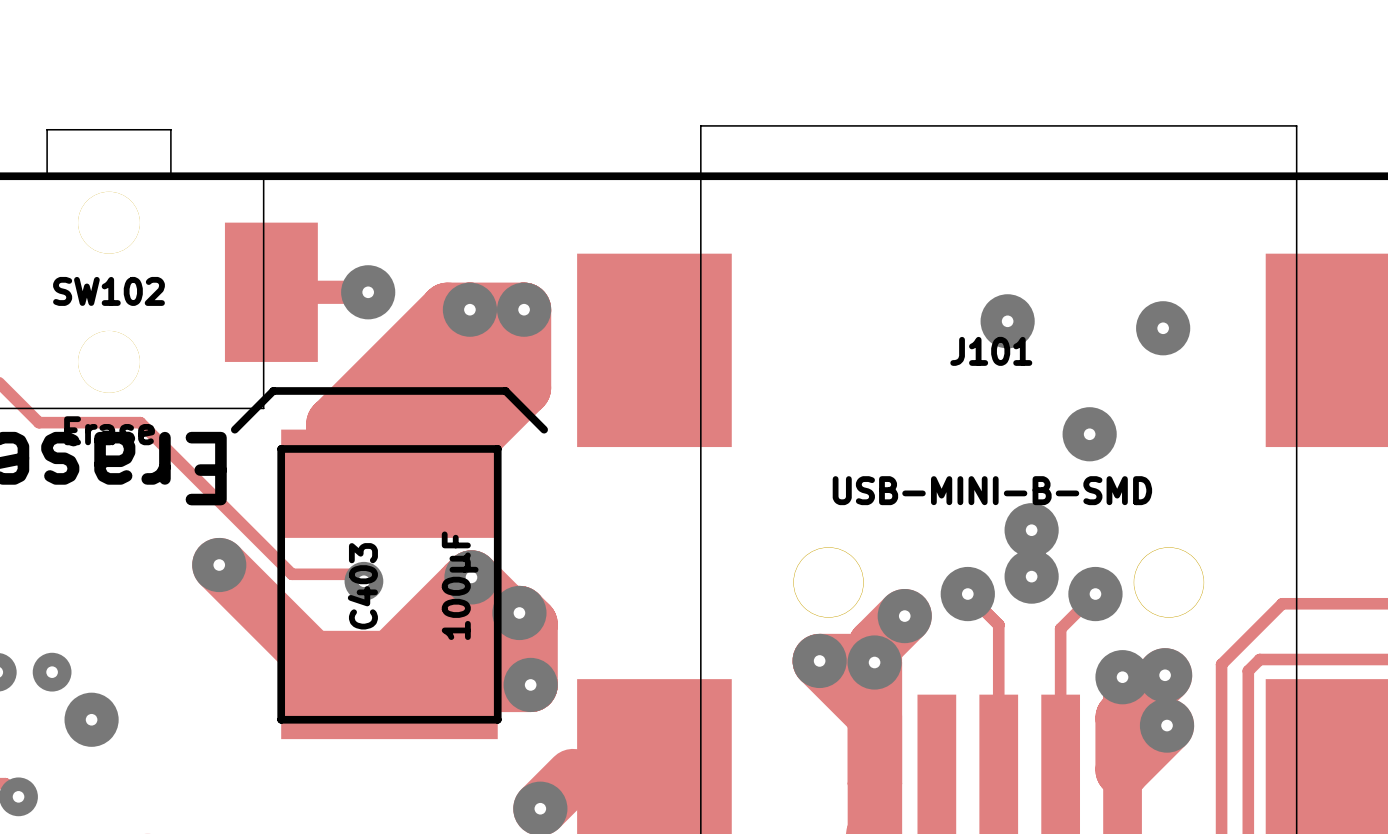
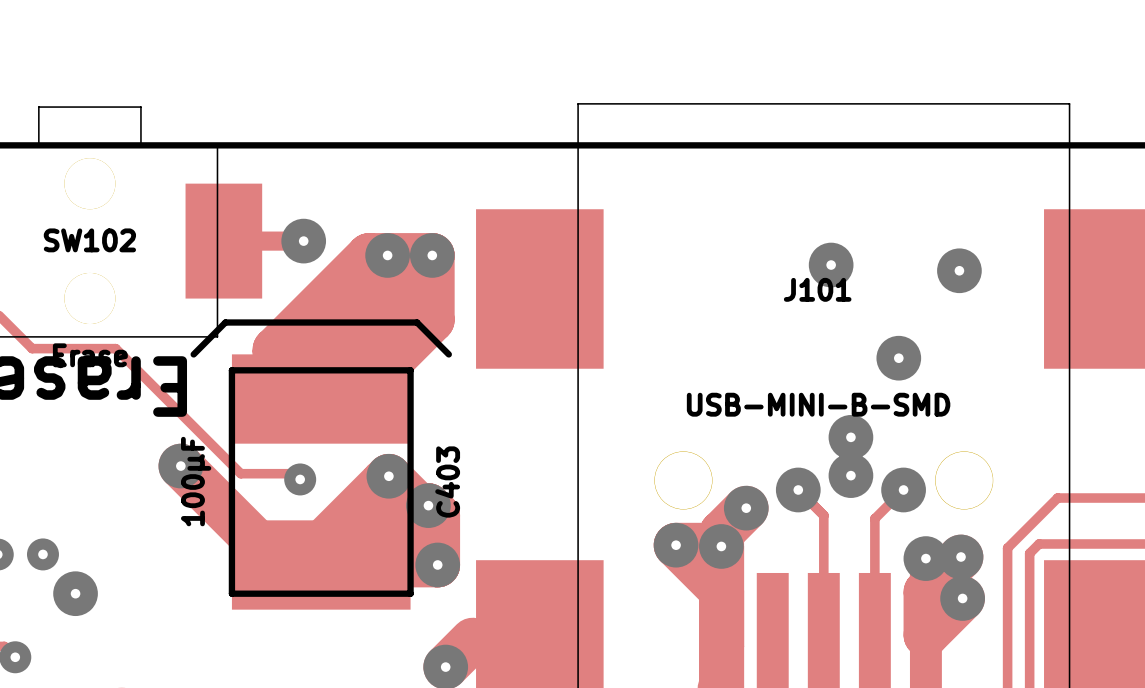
C403 value position: 100µF (460, 585) -> 100µF (196, 481)
C403 name position: C403 (362, 586) -> C403 (447, 482)

